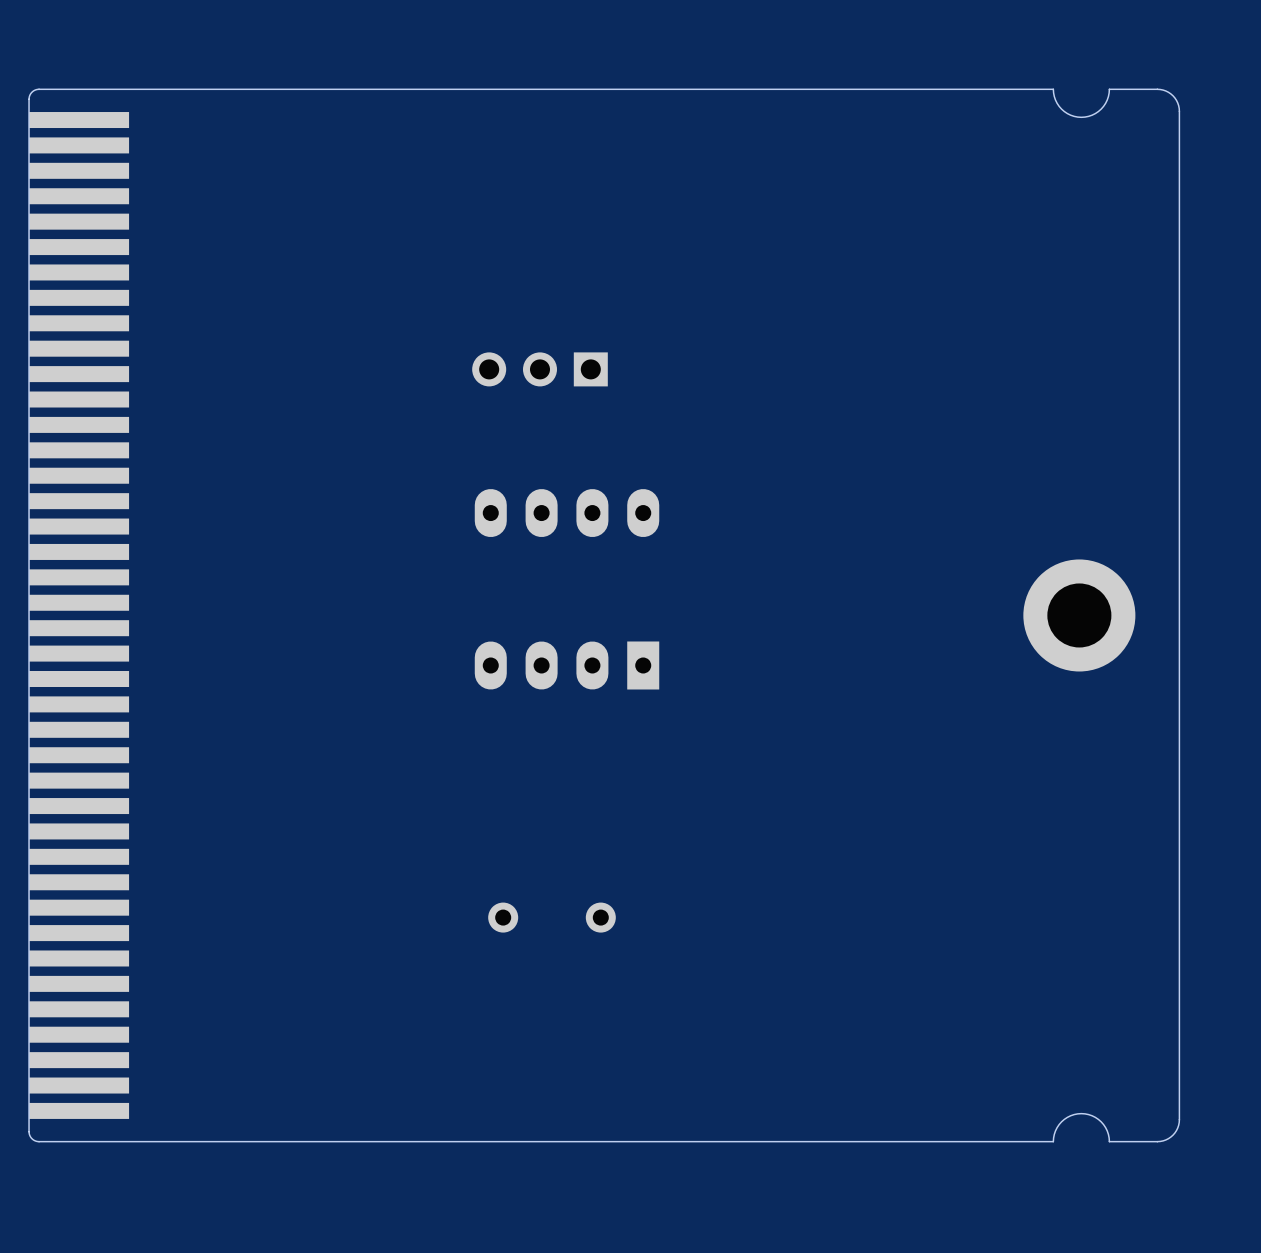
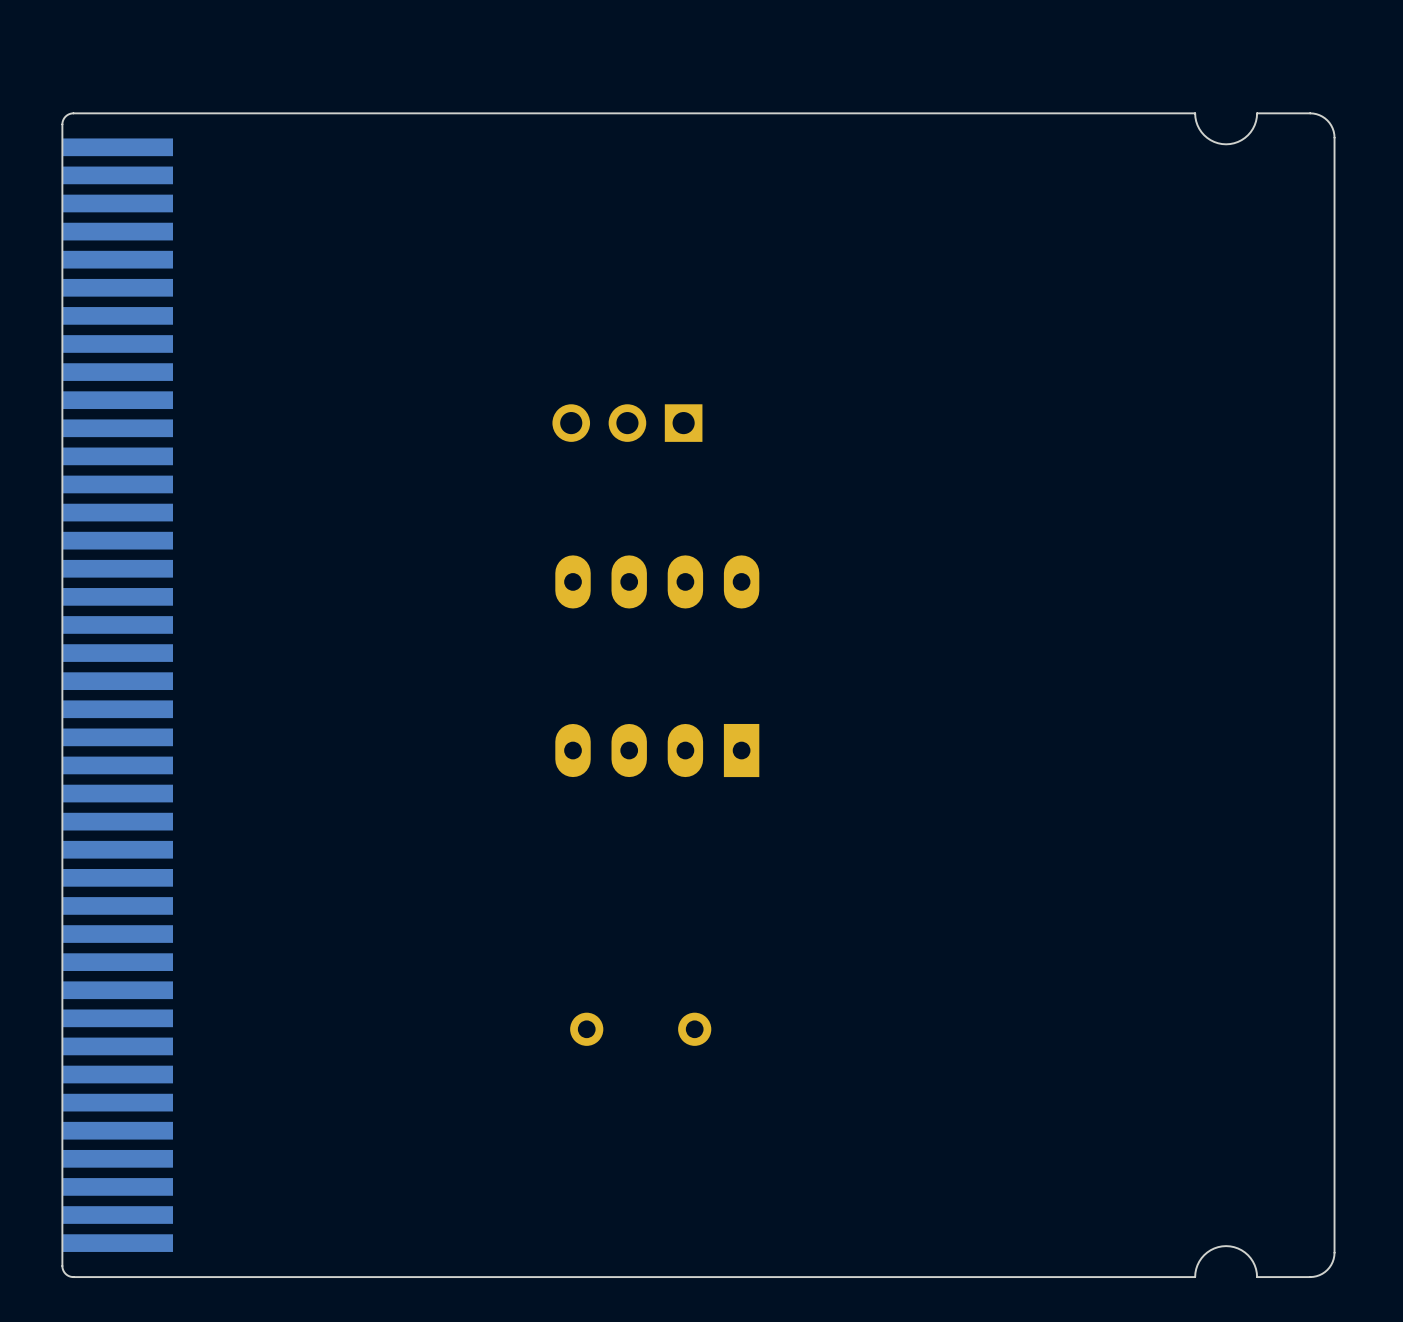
part: (1079, 615) -> none

